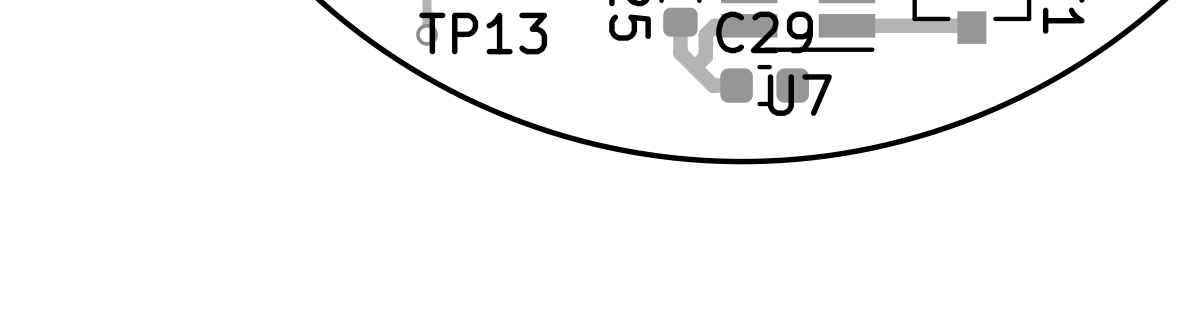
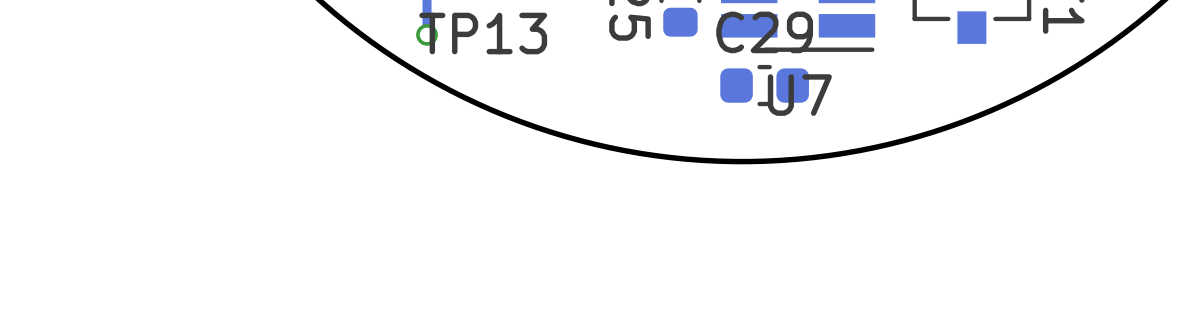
track: (680, 22) (680, 52) (713, 85) (736, 85) -> none
track: (749, 25) (714, 25) (705, 34) (705, 56) (694, 67) -> none
track: (846, 25) (970, 25) (971, 27) -> none

